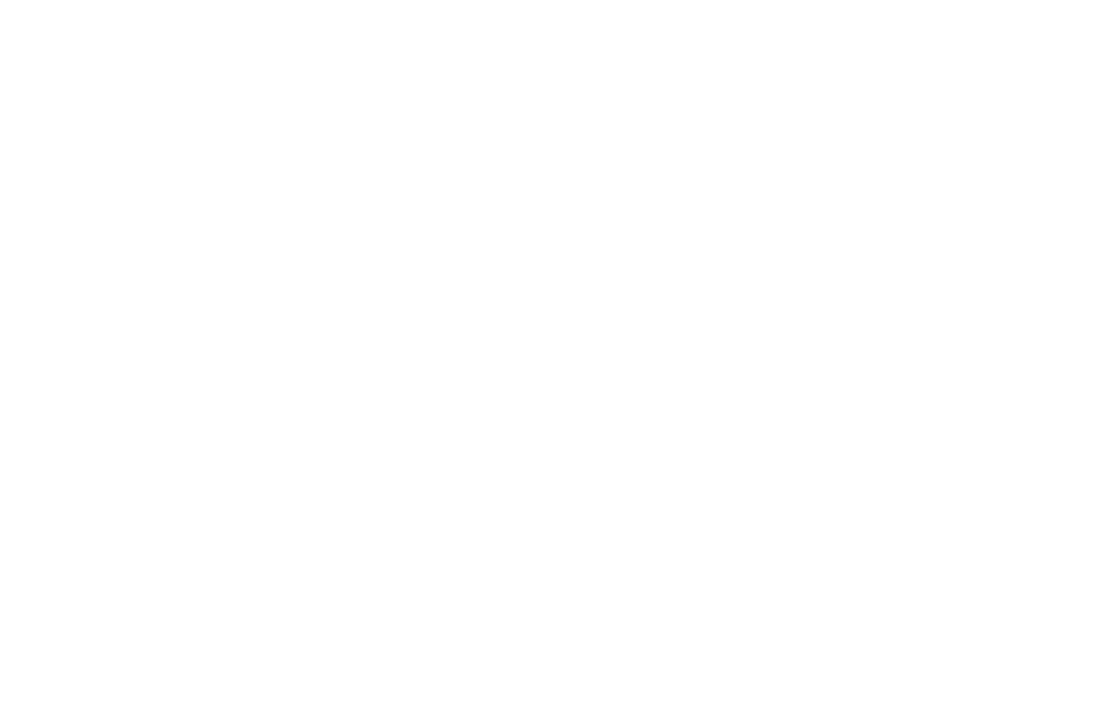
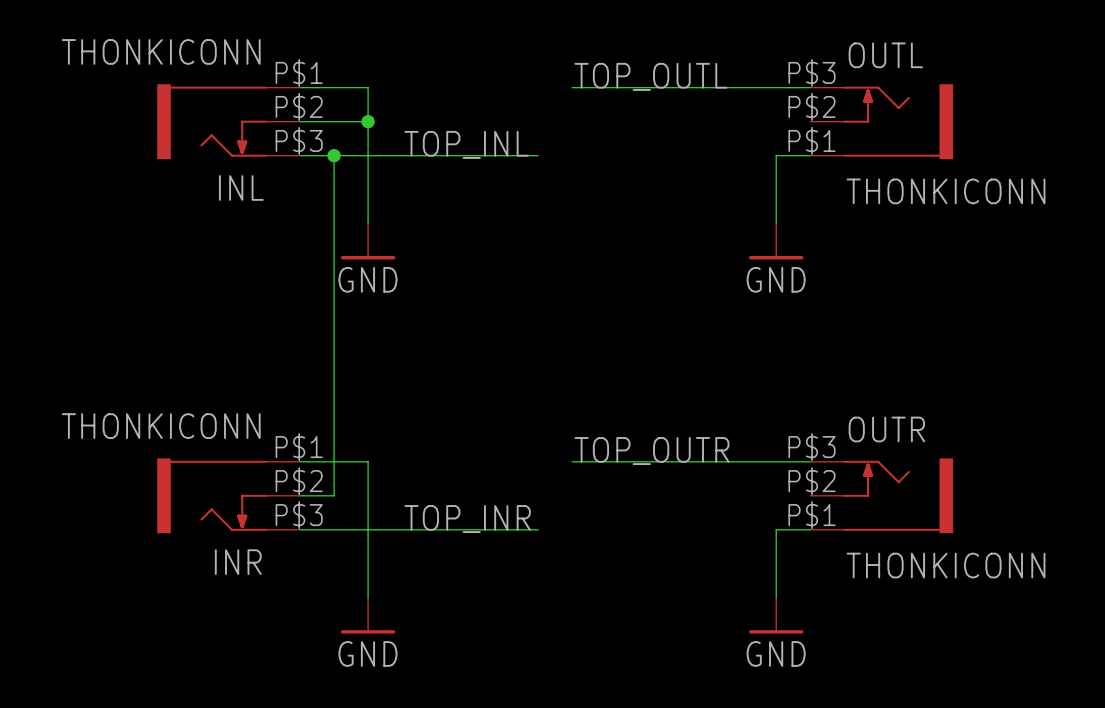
label: none -> TOP_OUTL (650, 76)
wire: none -> (300, 87) (368, 87) (368, 223)
wire: none -> (572, 87) (810, 87)
INL: none -> THONKICONN (228, 121)
wire: none -> (300, 121) (368, 121)
junction: none -> (368, 121)
OUTL: none -> THONKICONN (881, 121)
label: none -> TOP_INL (466, 144)
wire: none -> (300, 155) (538, 155)
wire: none -> (334, 155) (334, 495) (300, 495)
junction: none -> (334, 155)
wire: none -> (810, 155) (776, 155) (776, 223)
power symbol: none -> GND (368, 241)
power symbol: none -> GND (776, 241)
label: none -> TOP_OUTR (651, 451)
wire: none -> (300, 461) (368, 461) (368, 597)
wire: none -> (572, 461) (810, 461)
INR: none -> THONKICONN (228, 495)
OUTR: none -> THONKICONN (881, 495)
label: none -> TOP_INR (467, 519)
wire: none -> (300, 529) (538, 529)
wire: none -> (810, 529) (776, 529) (776, 597)
power symbol: none -> GND (368, 615)
power symbol: none -> GND (776, 615)

